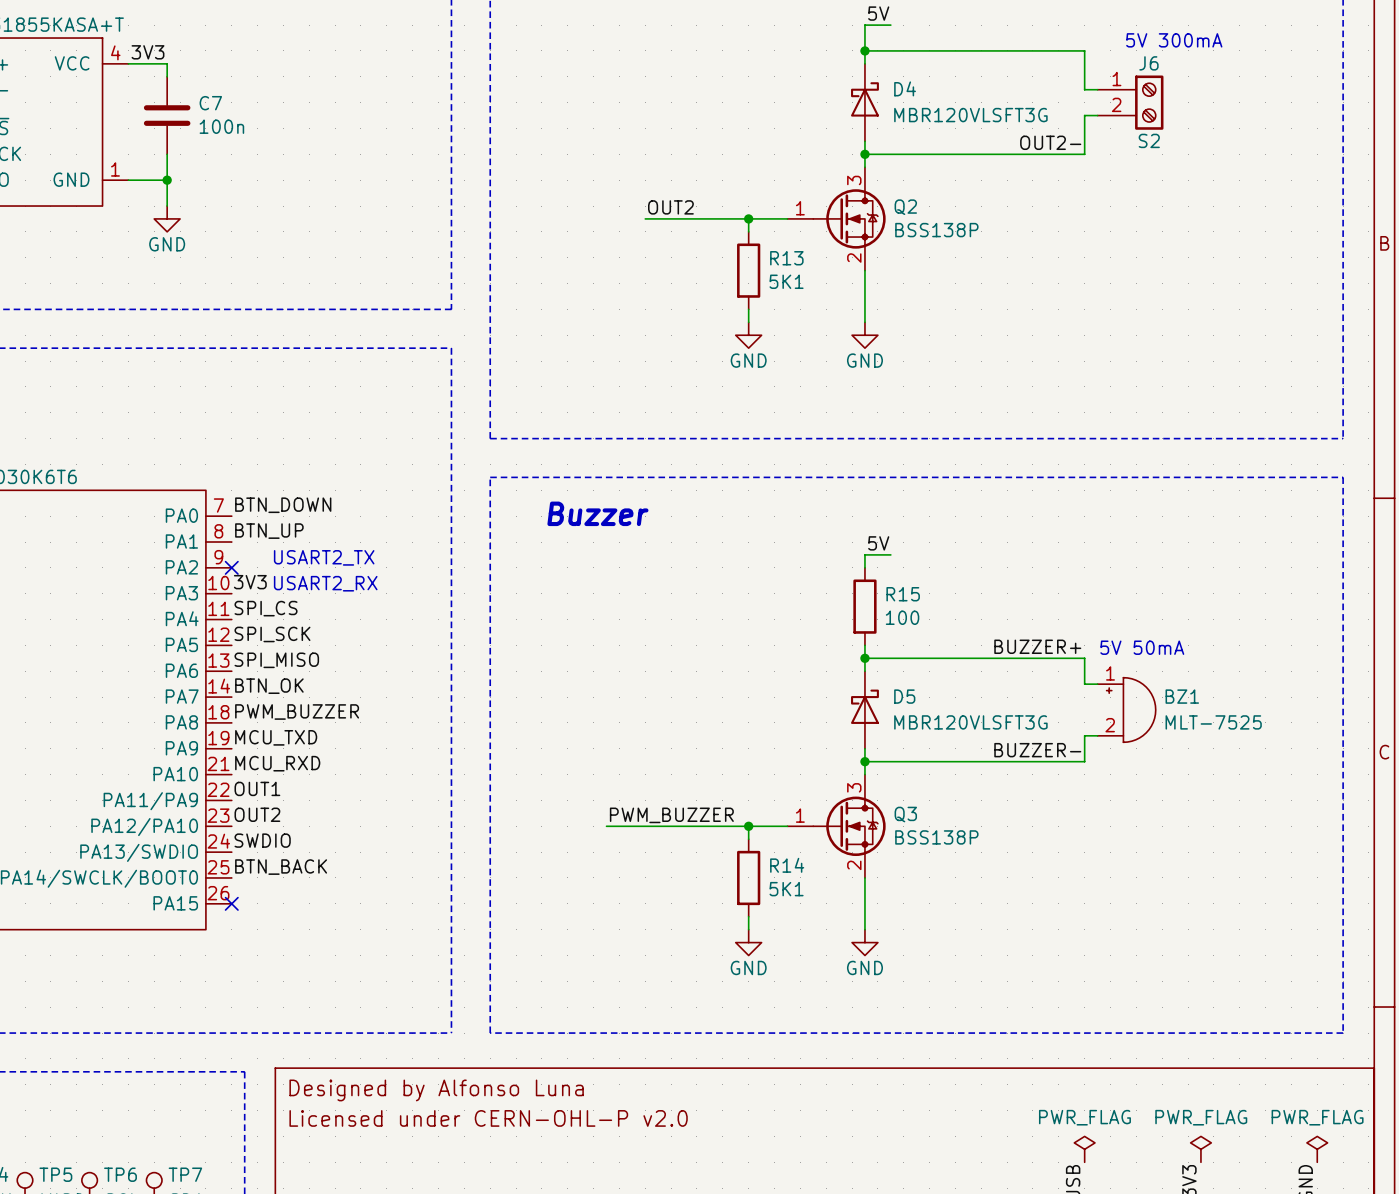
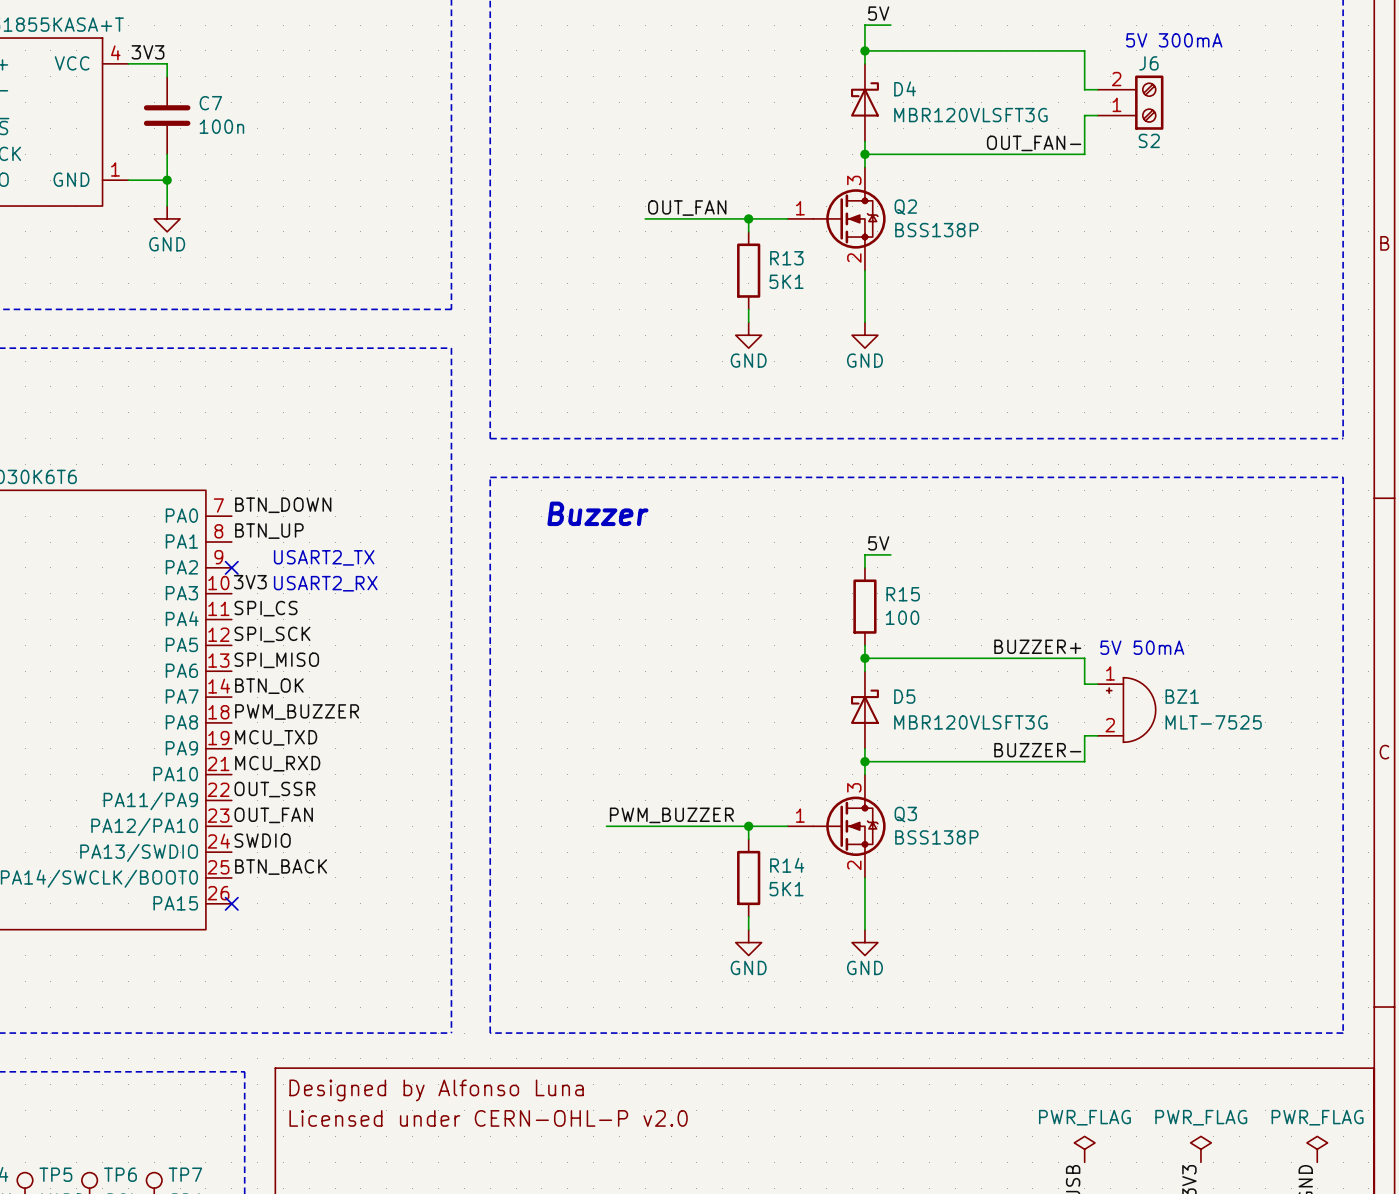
J6 flip: as is (1149, 102) -> up-down (1149, 102)
label: OUT2- (1050, 142) -> OUT_FAN- (1034, 143)
label: OUT2 (670, 207) -> OUT_FAN (687, 208)
label: OUT1 (257, 788) -> OUT_SSR (274, 789)
label: OUT2 (257, 814) -> OUT_FAN (273, 815)

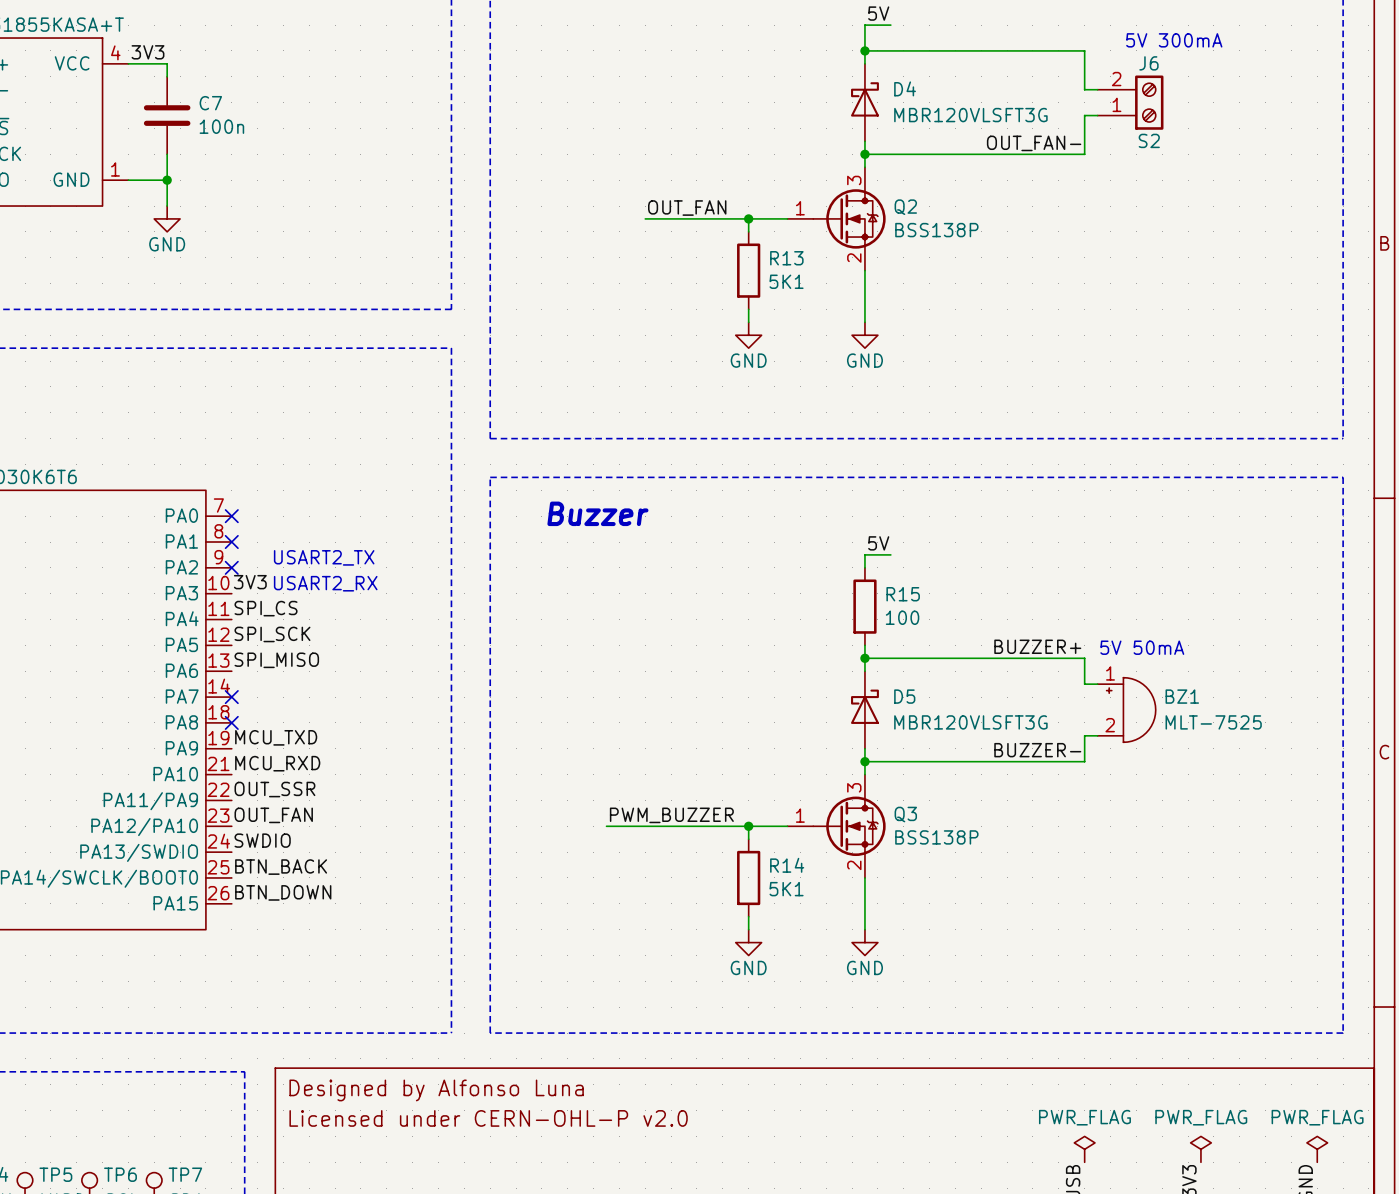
label: BTN_DOWN (283, 505) -> none
no-connect mark: none -> (231, 516)
label: BTN_UP (269, 531) -> none
no-connect mark: none -> (231, 542)
label: BTN_OK (269, 686) -> none
no-connect mark: none -> (231, 697)
label: PWM_BUZZER (297, 712) -> none
no-connect mark: none -> (231, 722)
label: none -> BTN_DOWN (283, 892)
no-connect mark: (231, 903) -> none

